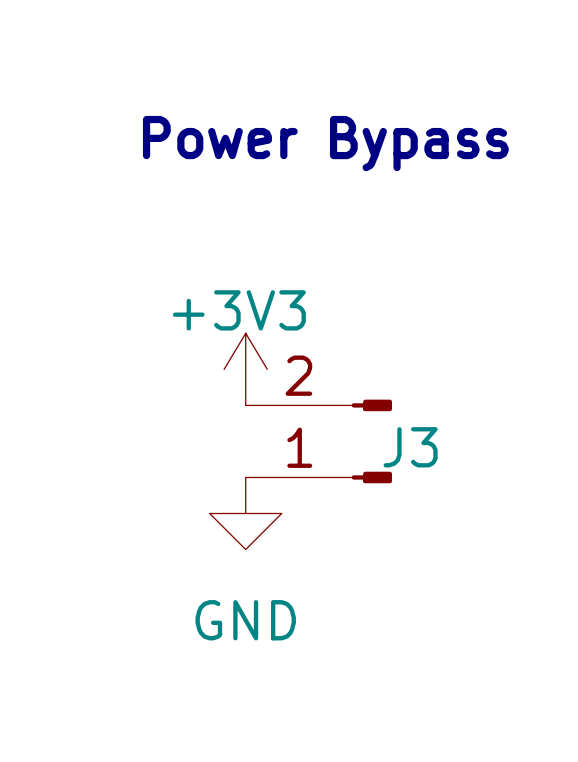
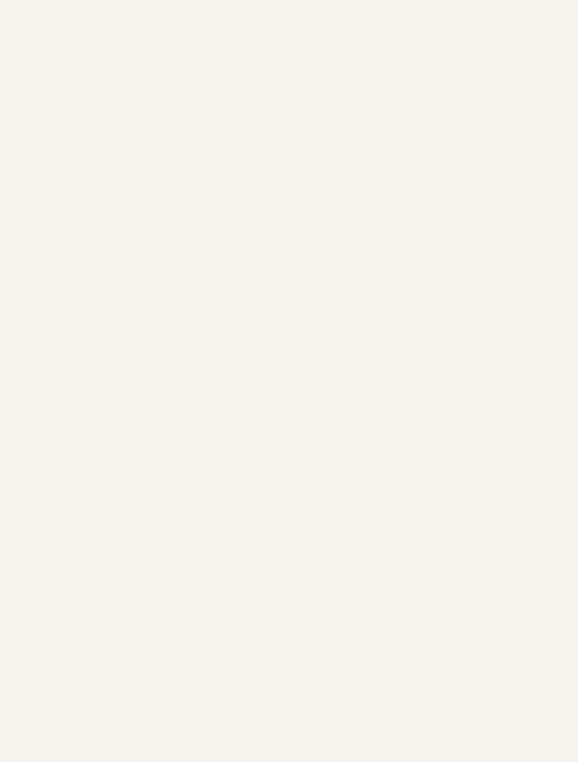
text: Power Bypass (325, 143) -> none
power symbol: +3V3 (245, 369) -> none
J3: (318, 441) -> none
power symbol: GND (245, 513) -> none

